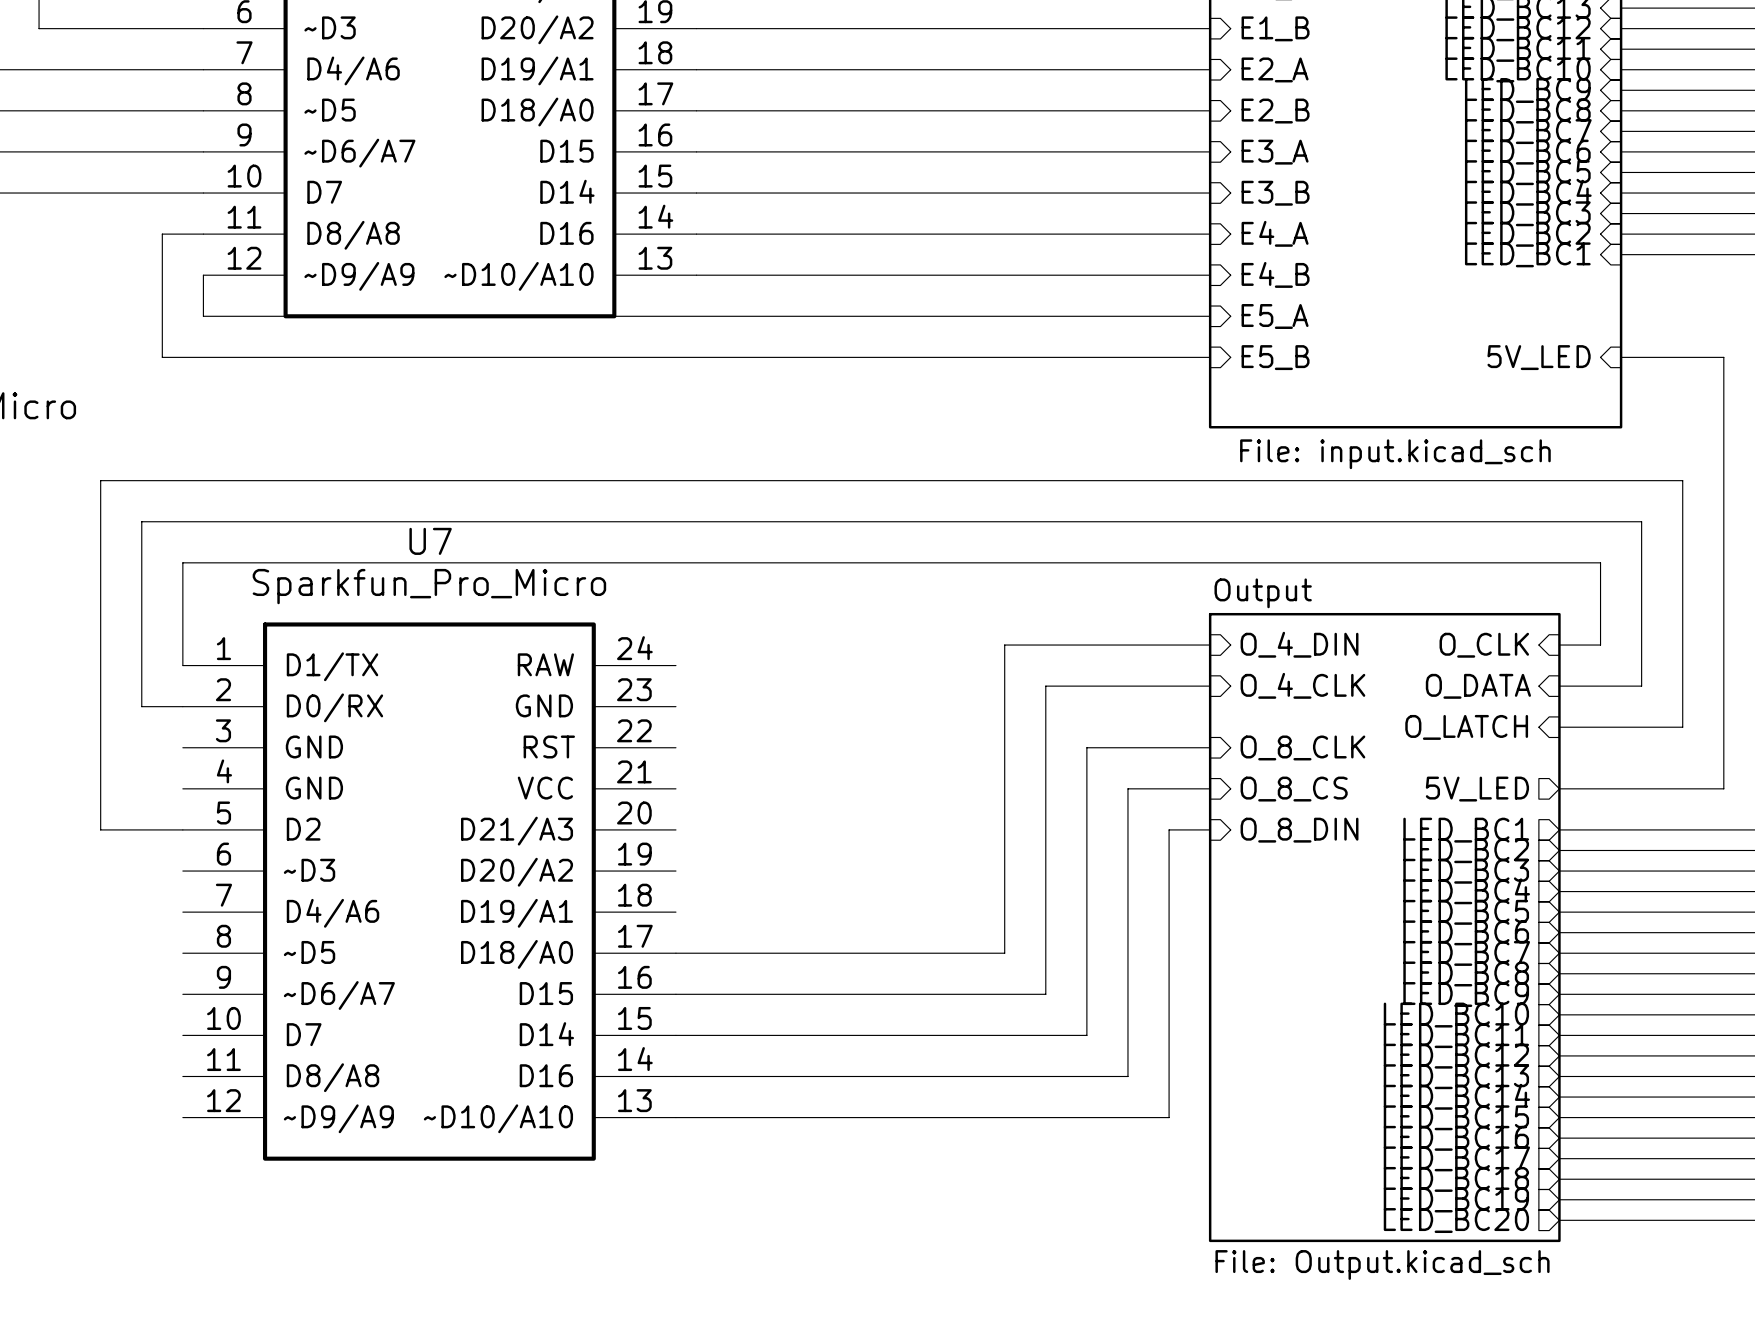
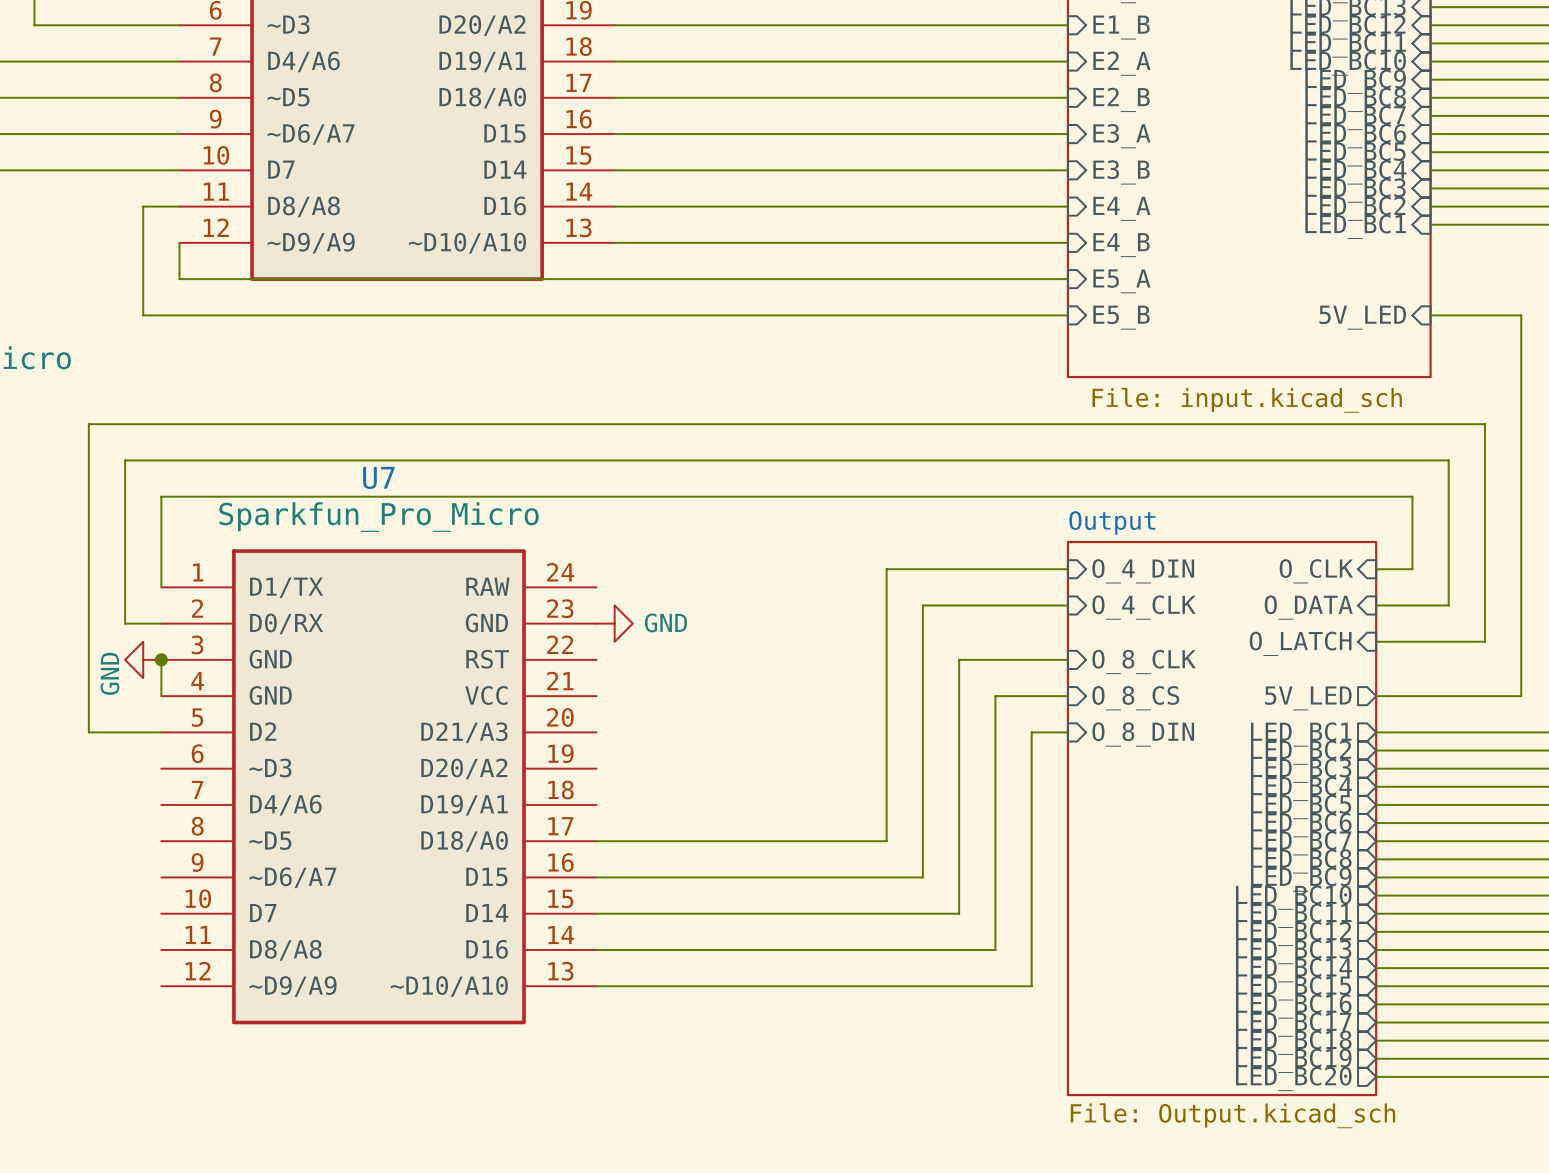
power symbol: none -> GND (614, 623)
power symbol: none -> GND (143, 659)
wire: none -> (161, 659) (161, 696)
junction: none -> (161, 659)

